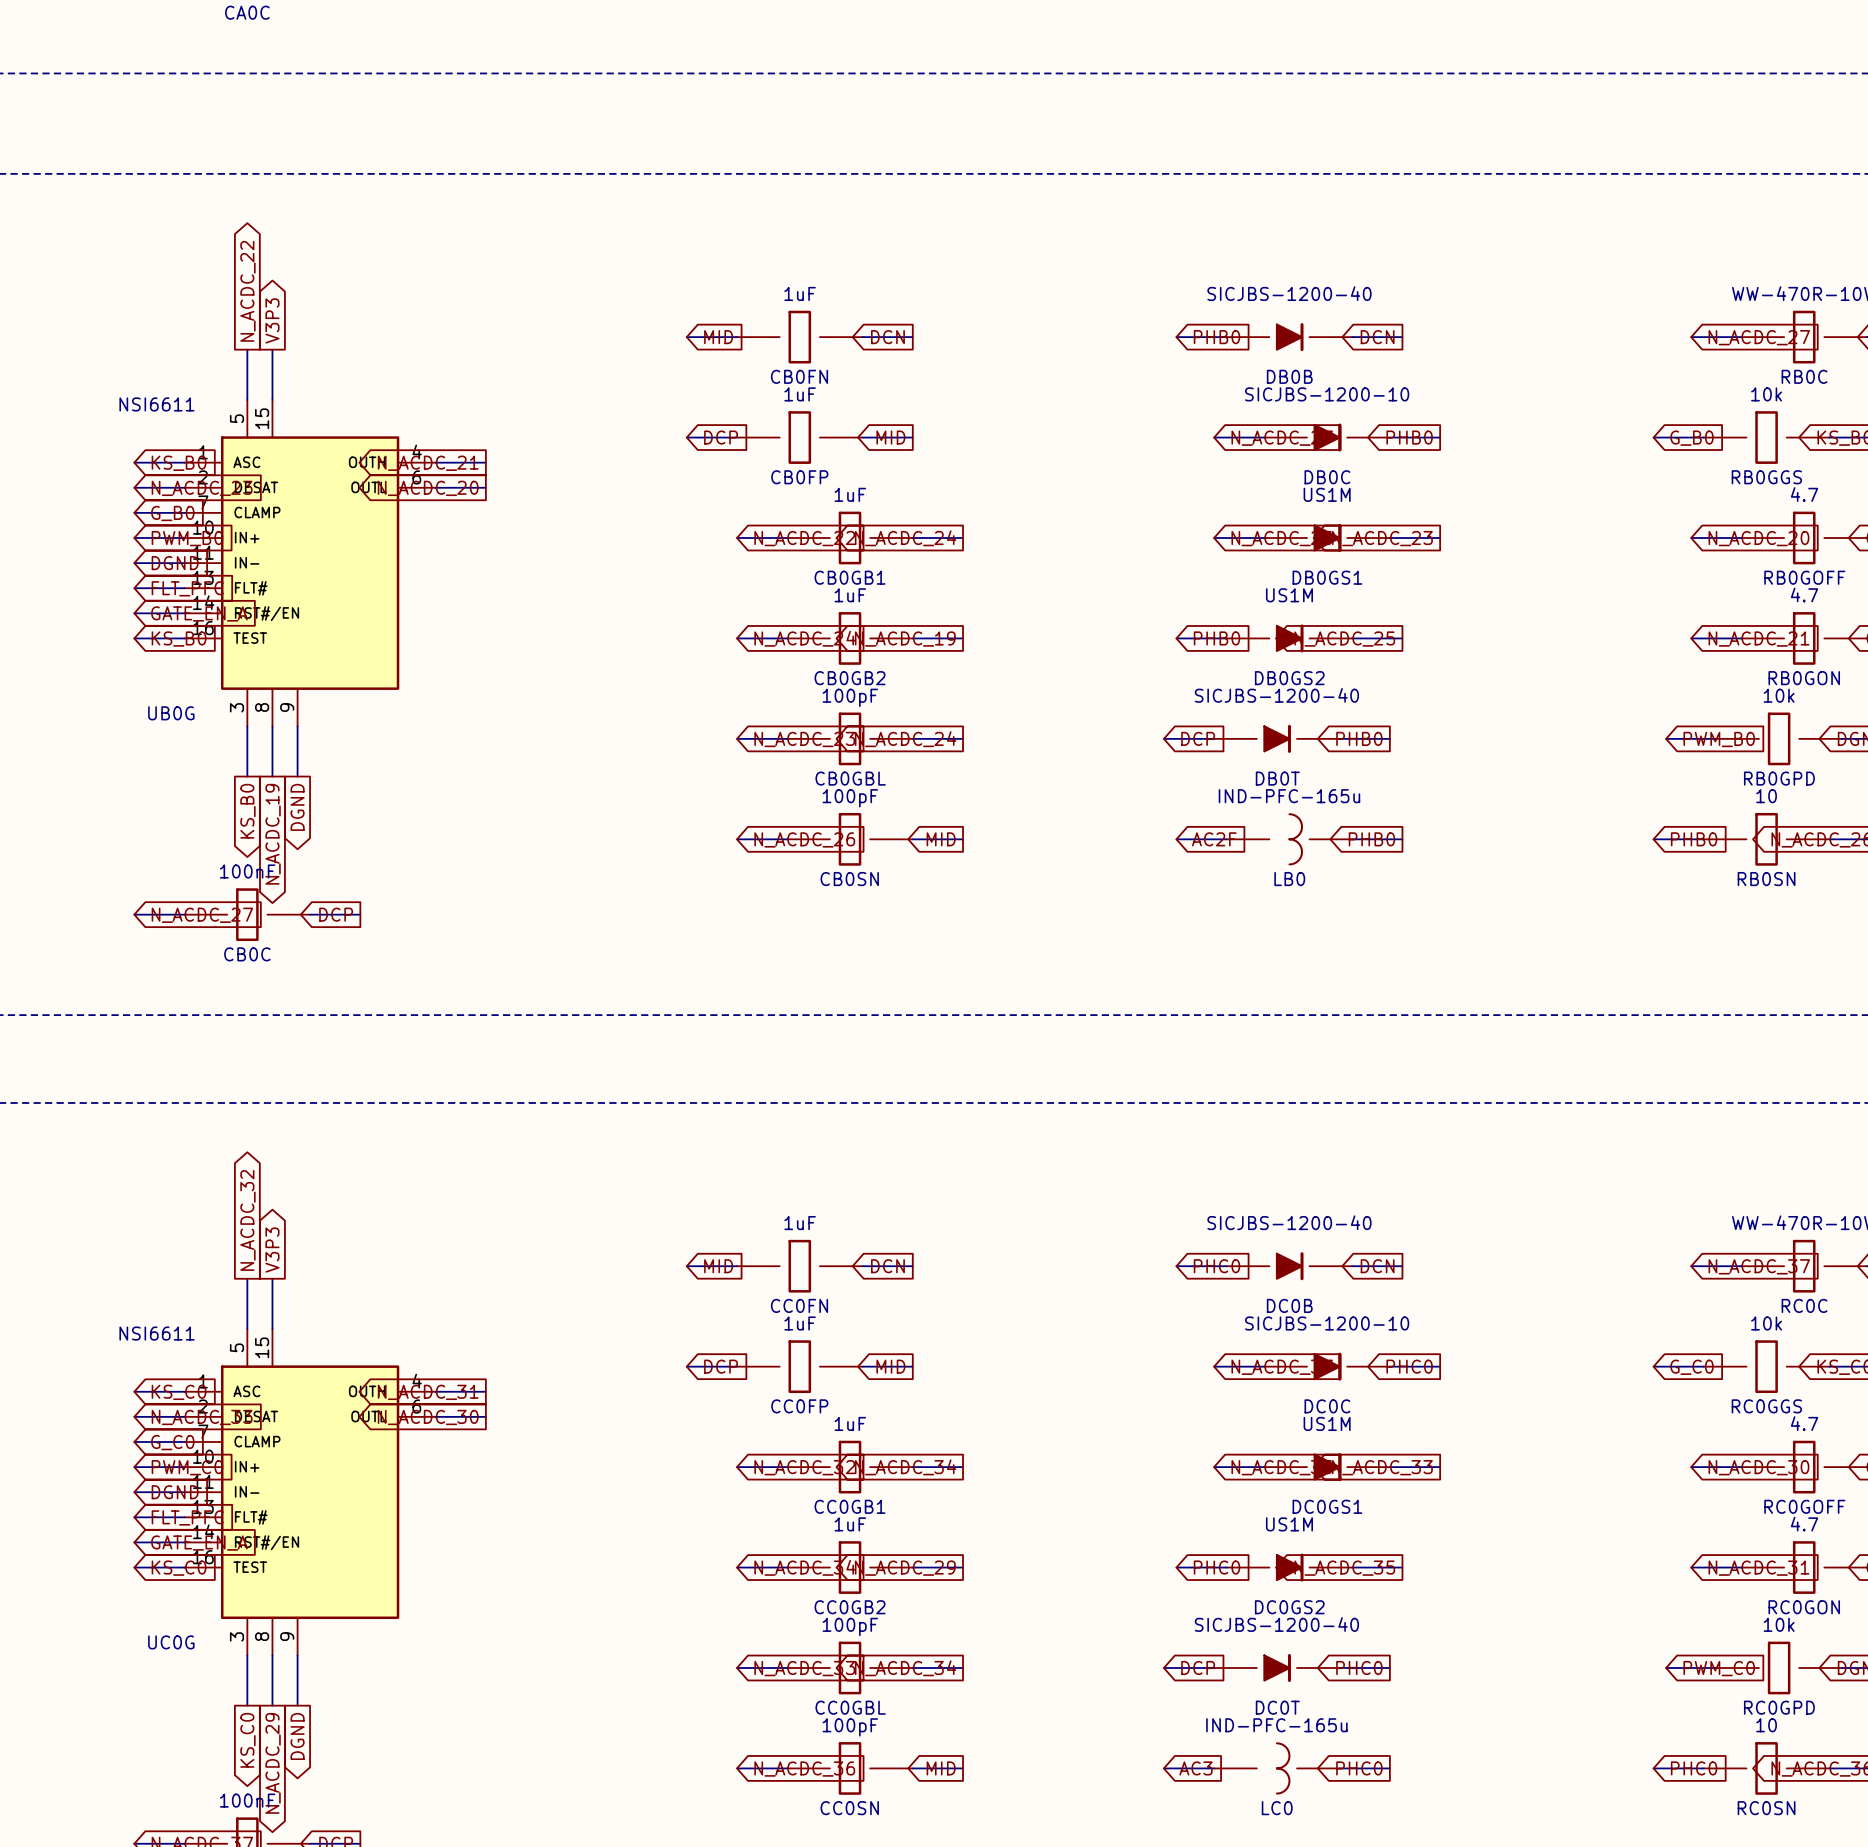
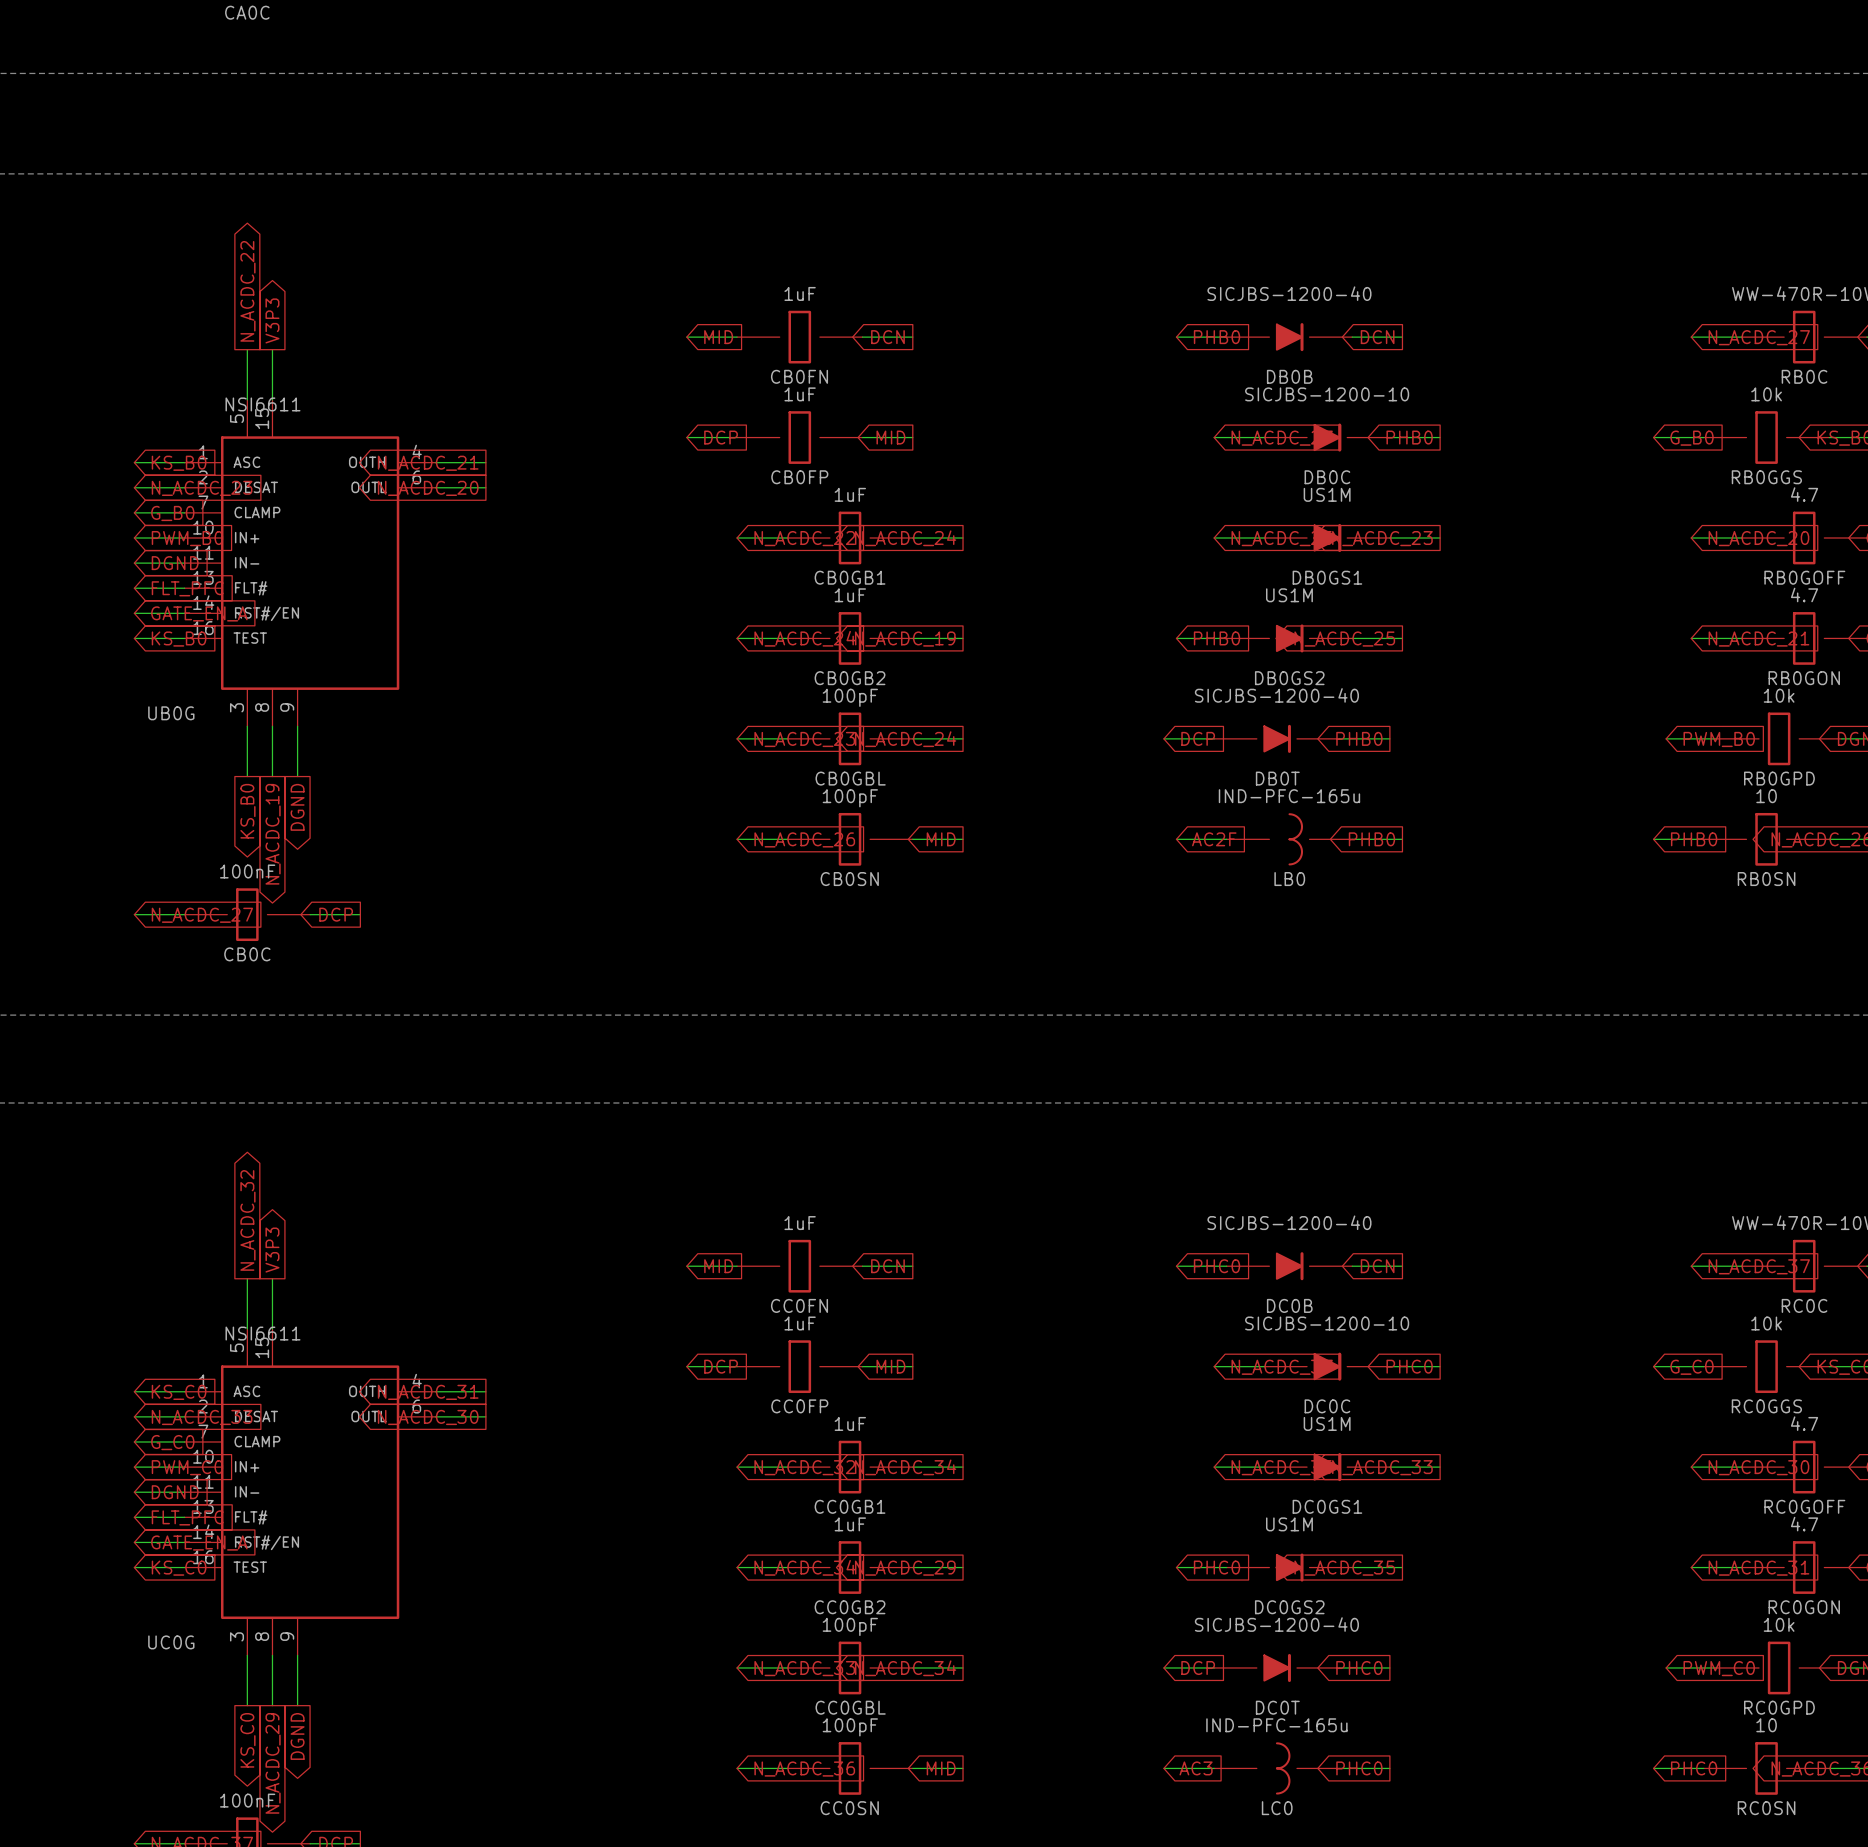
UB0G value position: NSI6611 (156, 404) -> NSI6611 (262, 404)
UC0G value position: NSI6611 (156, 1333) -> NSI6611 (262, 1333)

